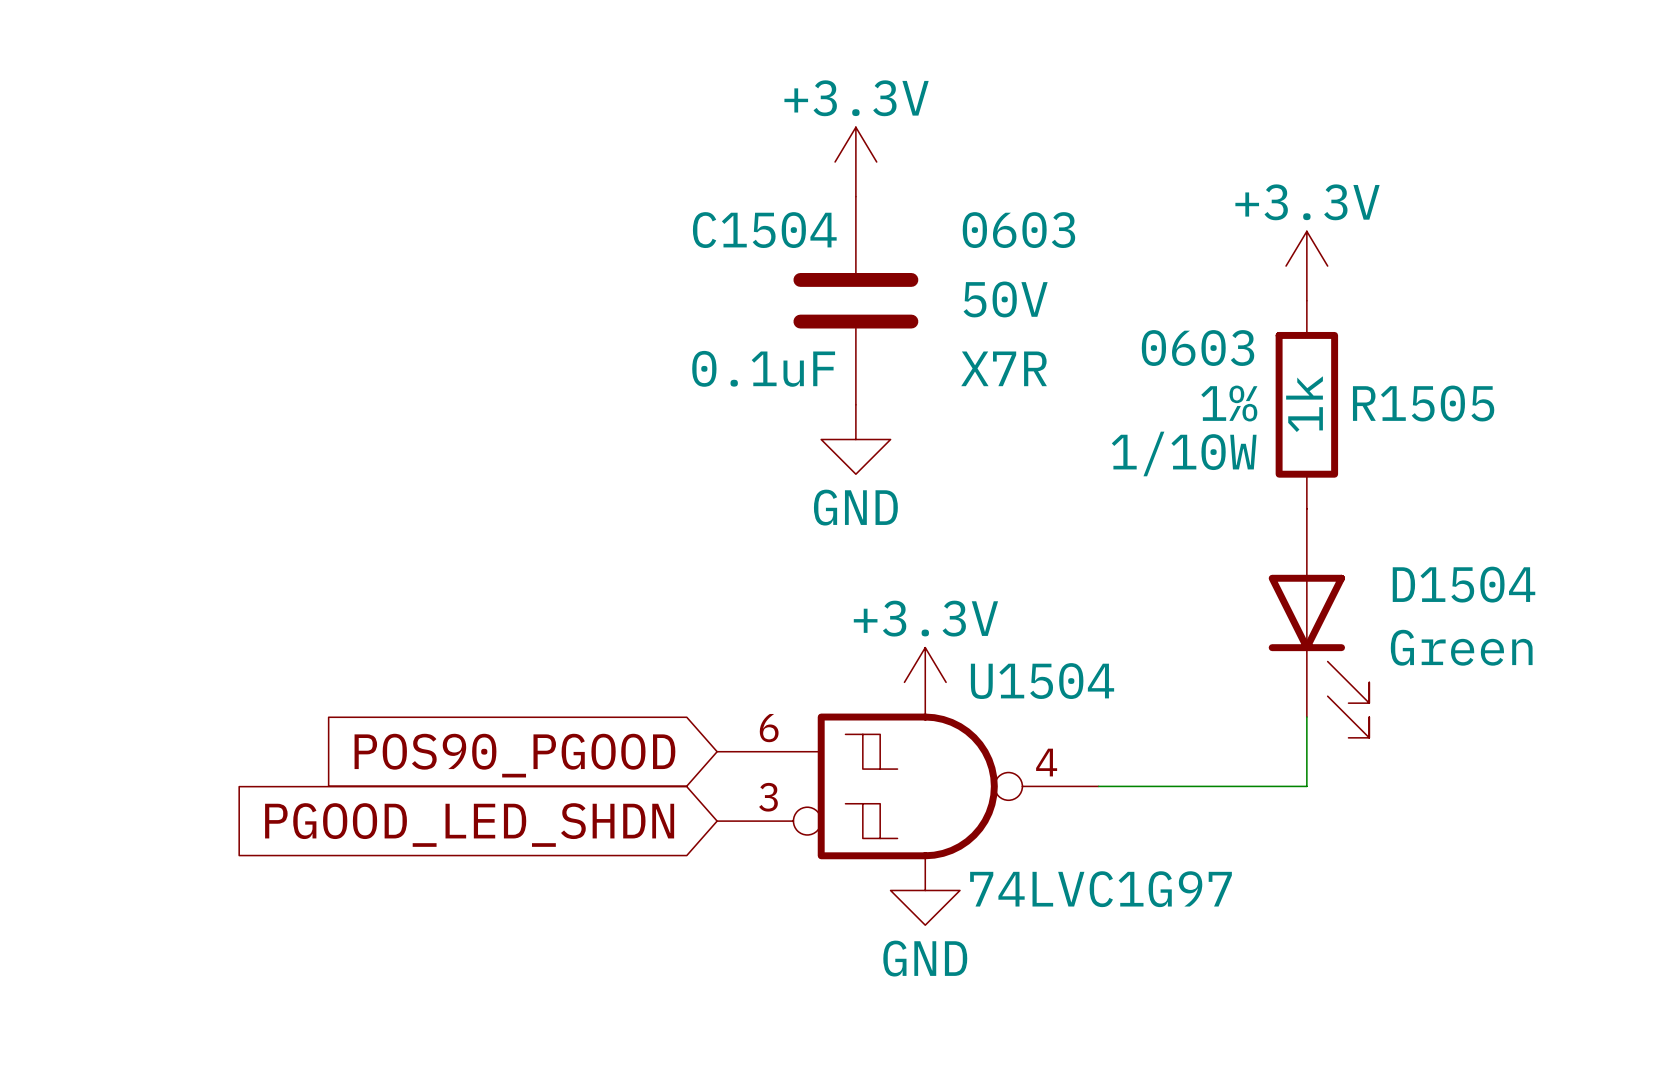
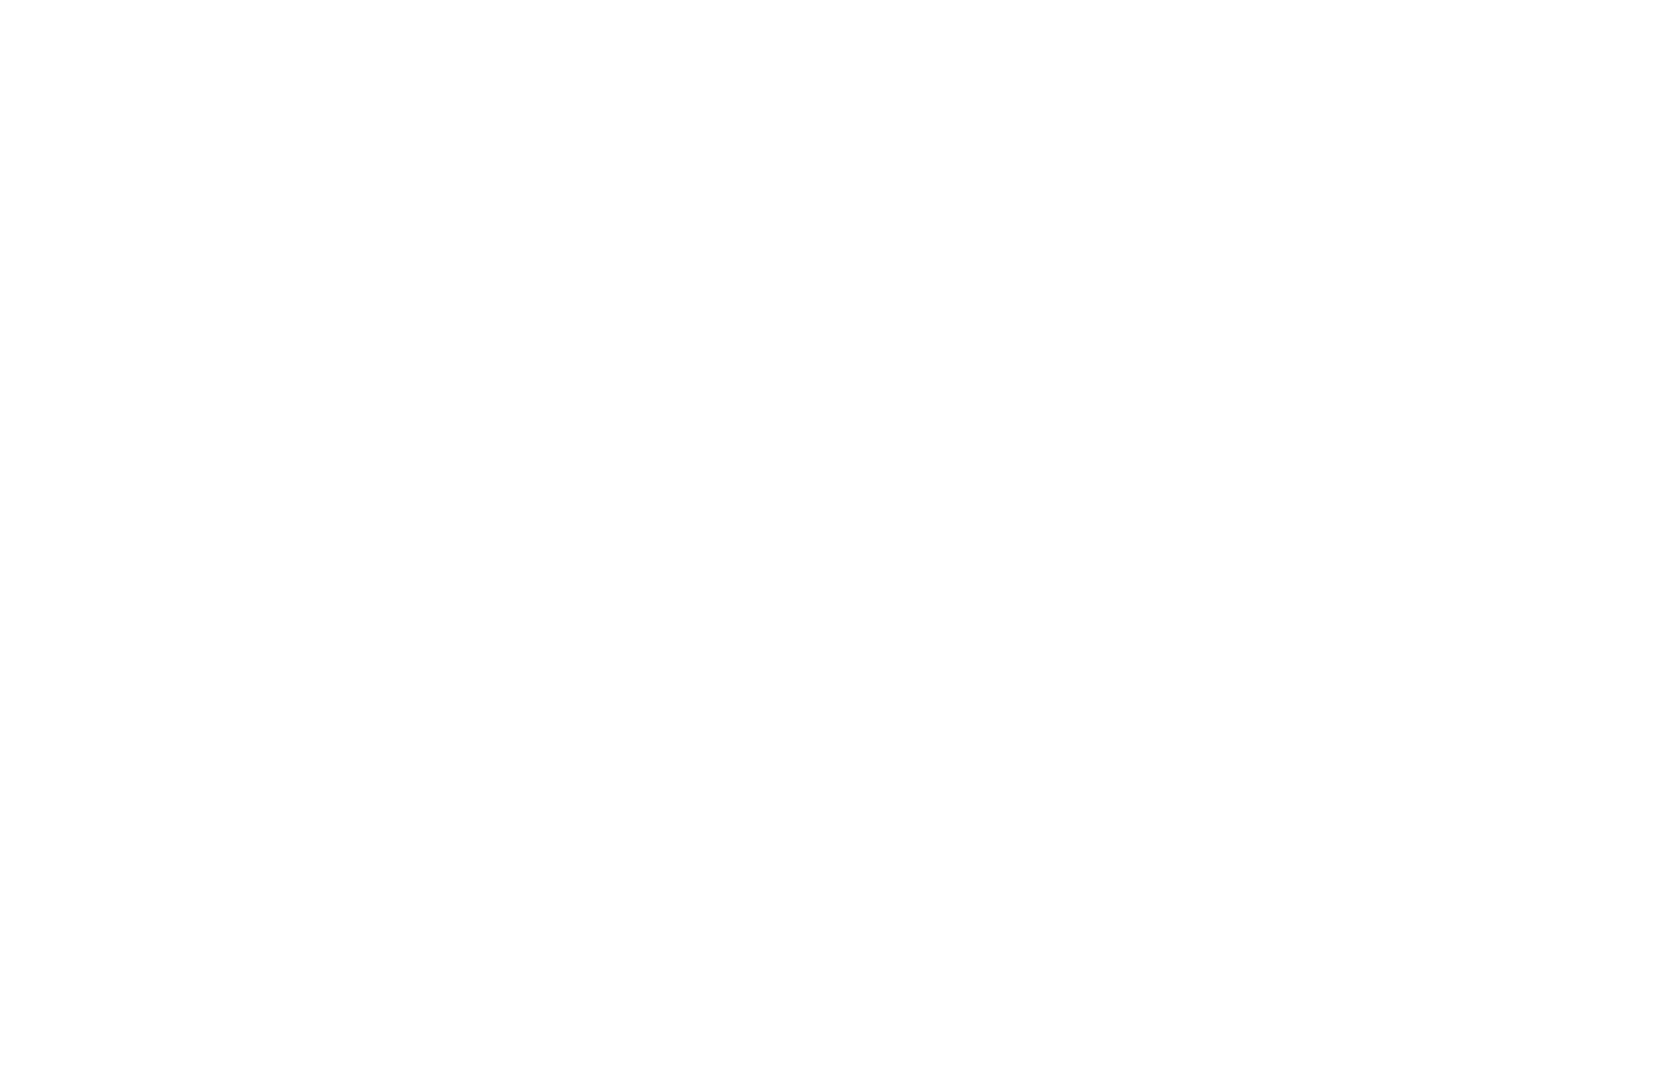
power symbol: +3.3V (855, 161) -> none
power symbol: +3.3V (1306, 266) -> none
C1504: 0.1uF (855, 300) -> none
R1505: 1k (1306, 404) -> none
power symbol: GND (855, 439) -> none
D1504: Green (1319, 623) -> none
power symbol: +3.3V (925, 682) -> none
wire: (1306, 717) (1306, 786) (1098, 786) -> none
global label: POS90_PGOOD (514, 755) -> none
U1504: 74LVC1G97 (907, 786) -> none
global label: PGOOD_LED_SHDN (469, 825) -> none
power symbol: GND (925, 890) -> none

